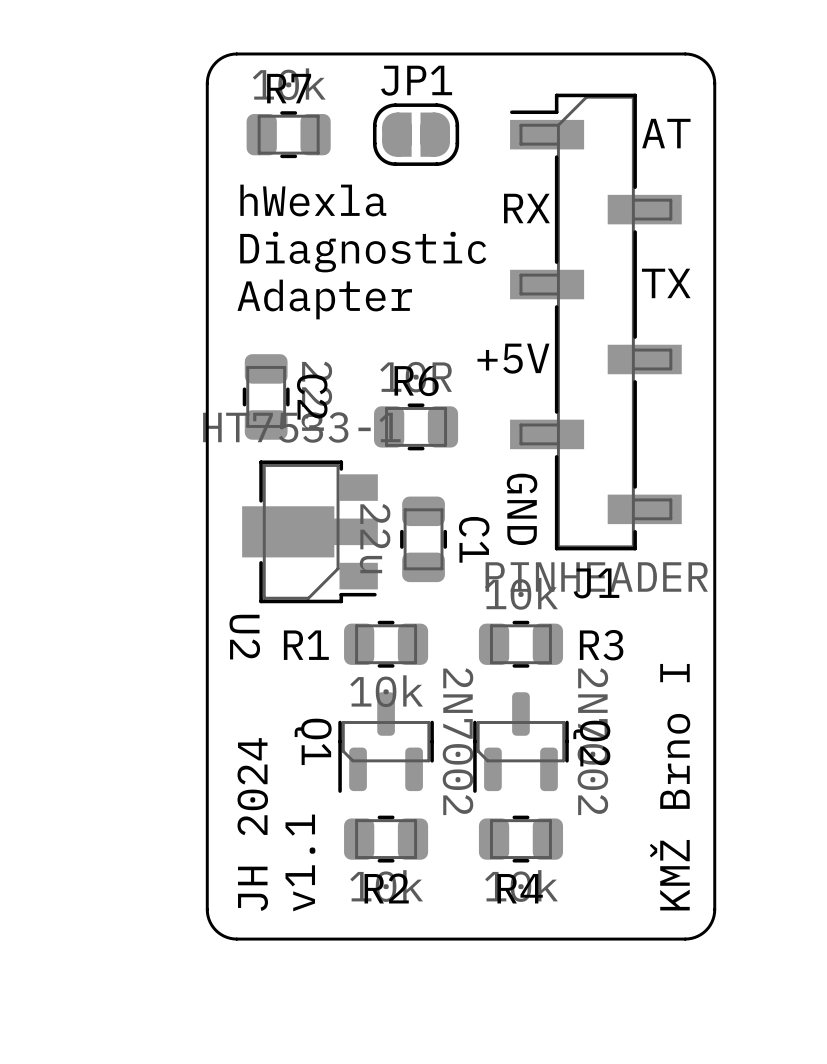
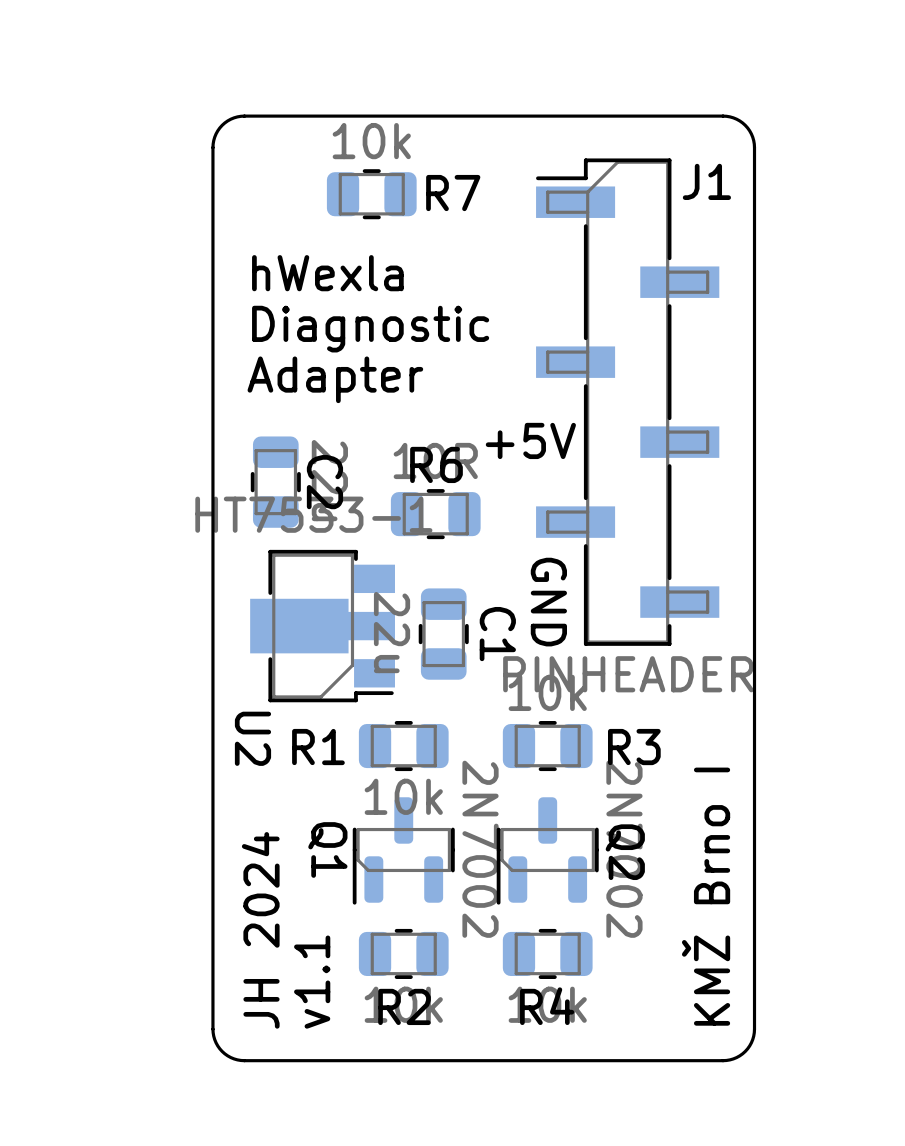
R7 name position: R7 (289, 88) -> R7 (453, 193)
text: AT (666, 133) -> none
R7 position: (288, 134) -> (371, 194)
JP1: (416, 134) -> none
text: RX (526, 208) -> none
text: TX (666, 283) -> none
J1 name position: J1 (596, 583) -> J1 (706, 181)

